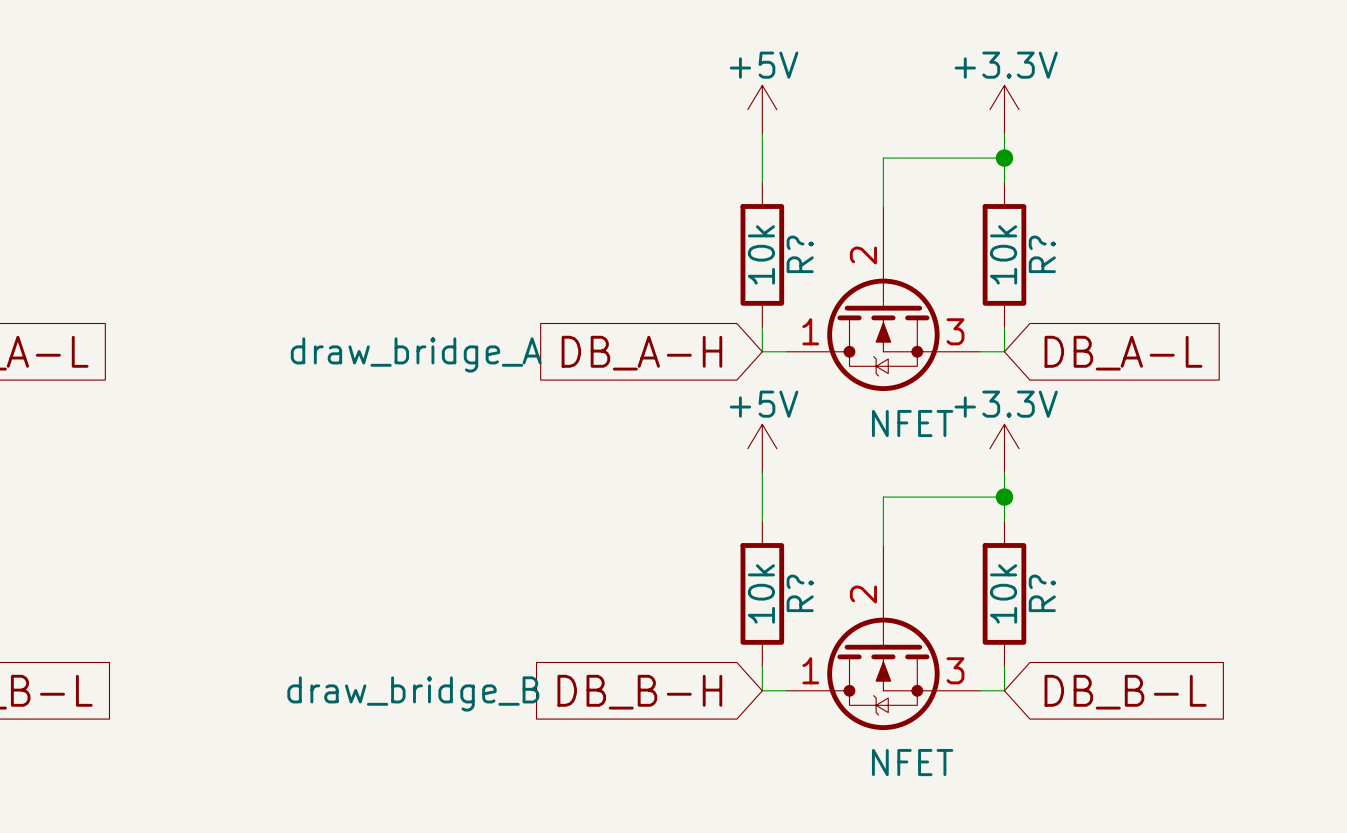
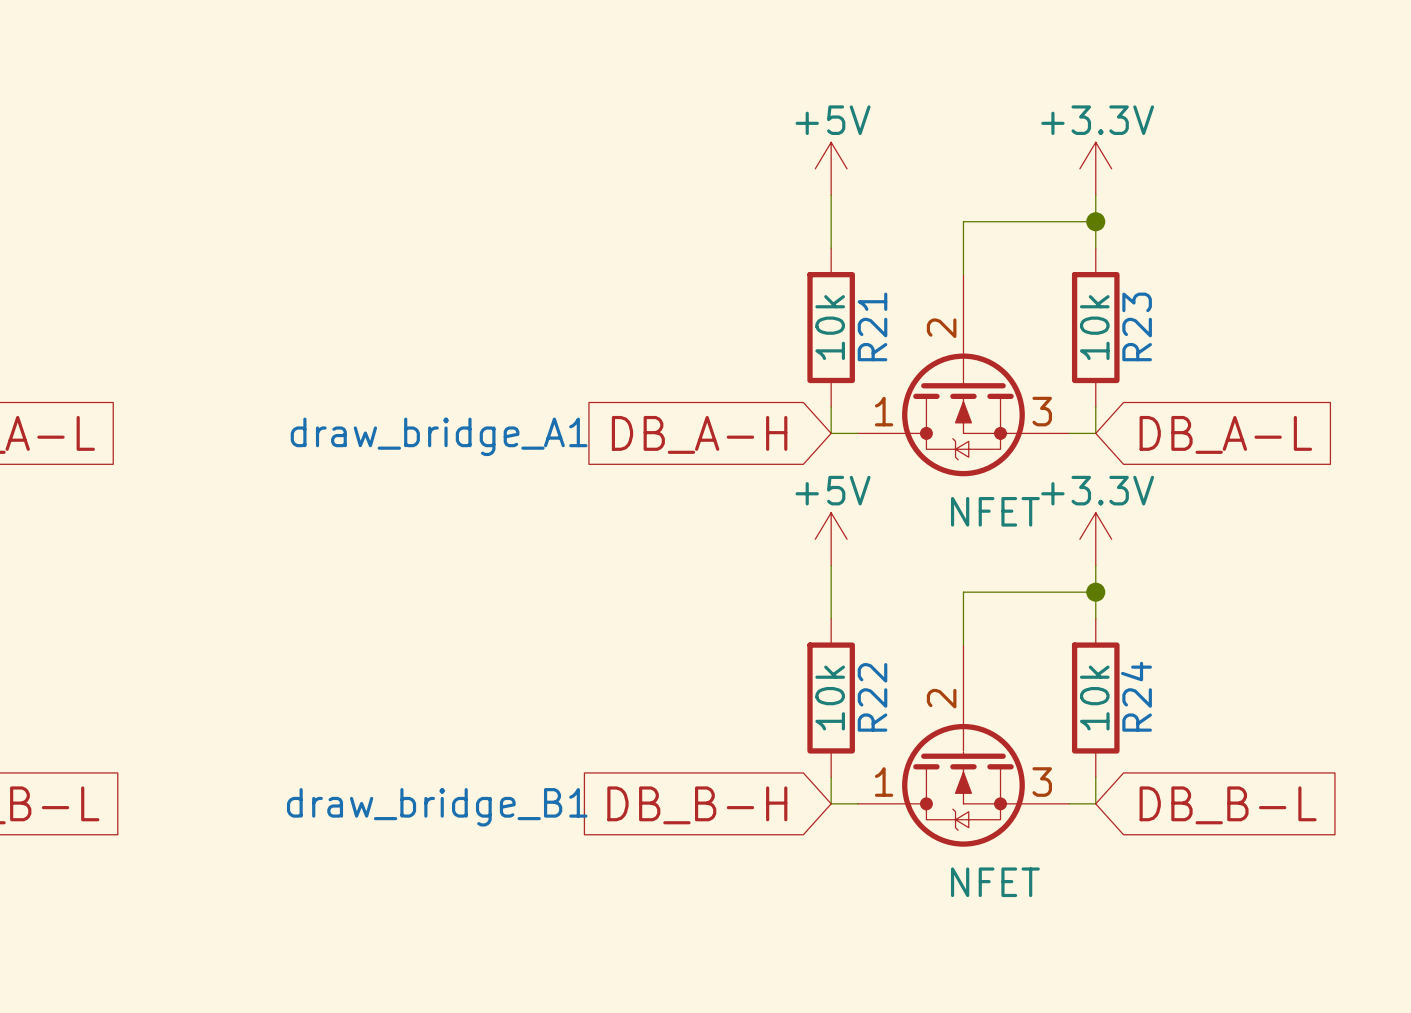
R? name: R? (800, 254) -> R21 (872, 326)
R? name: R? (1042, 254) -> R23 (1137, 326)
draw_bridge_A name: draw_bridge_A (416, 354) -> draw_bridge_A1 (439, 436)
R? name: R? (800, 593) -> R22 (872, 697)
R? name: R? (1042, 593) -> R24 (1136, 696)
draw_bridge_B name: draw_bridge_B (413, 693) -> draw_bridge_B1 (437, 807)

